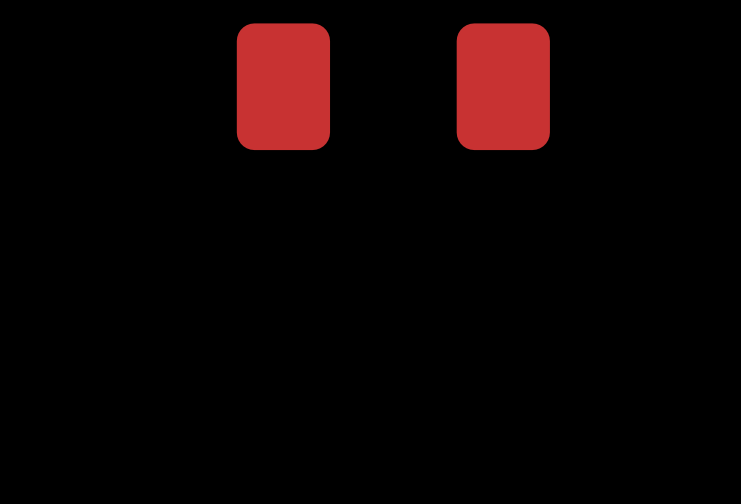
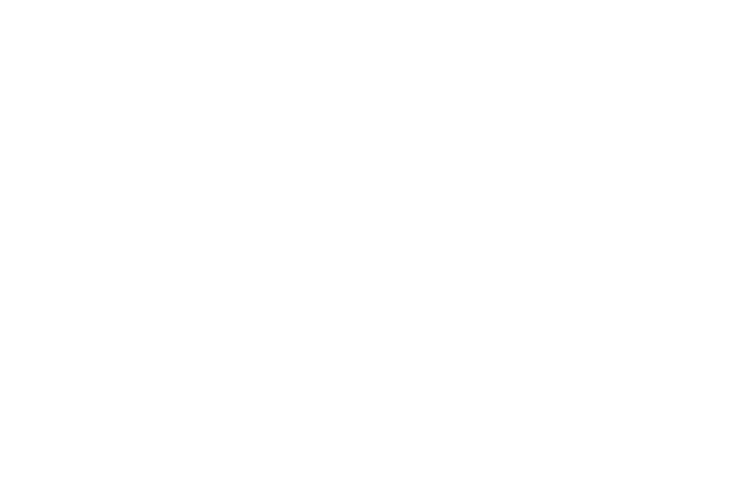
part: (393, 86) -> none

